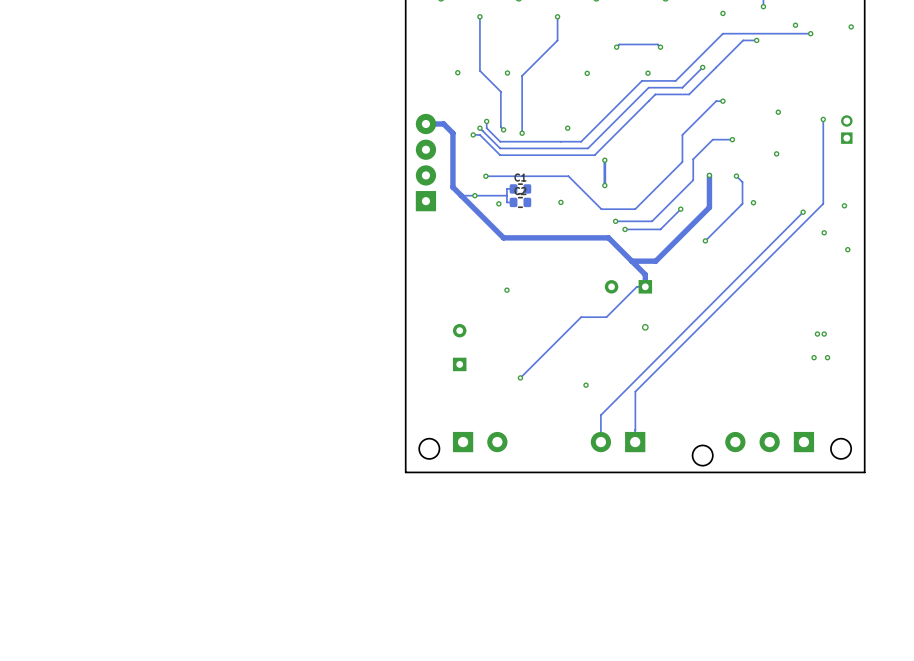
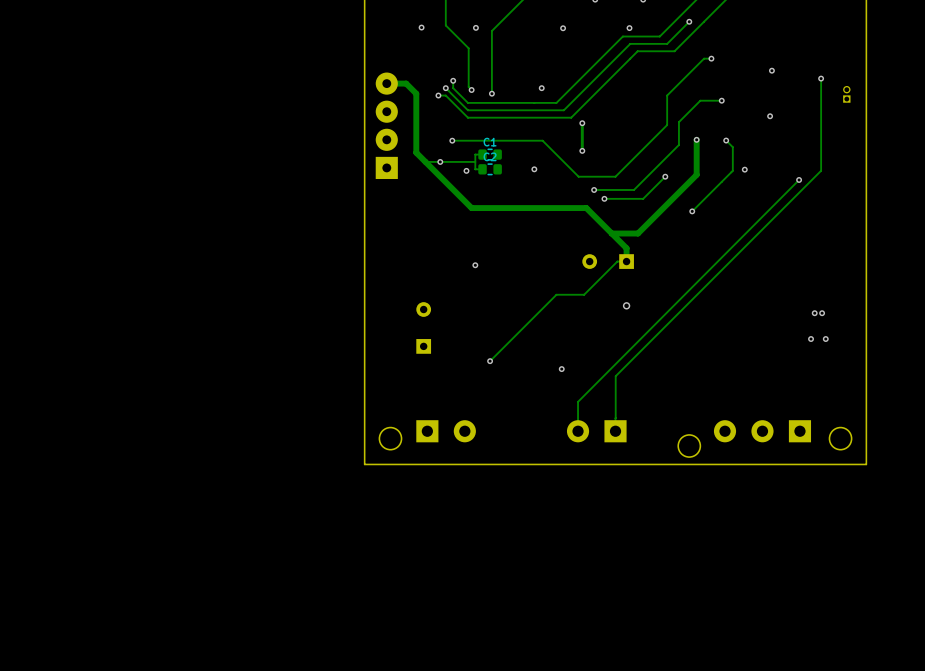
part footprint: [841, 115, 853, 144] -> [843, 85, 851, 103]
via: (844, 205) -> none
via: (824, 232) -> none
via: (847, 249) -> none

